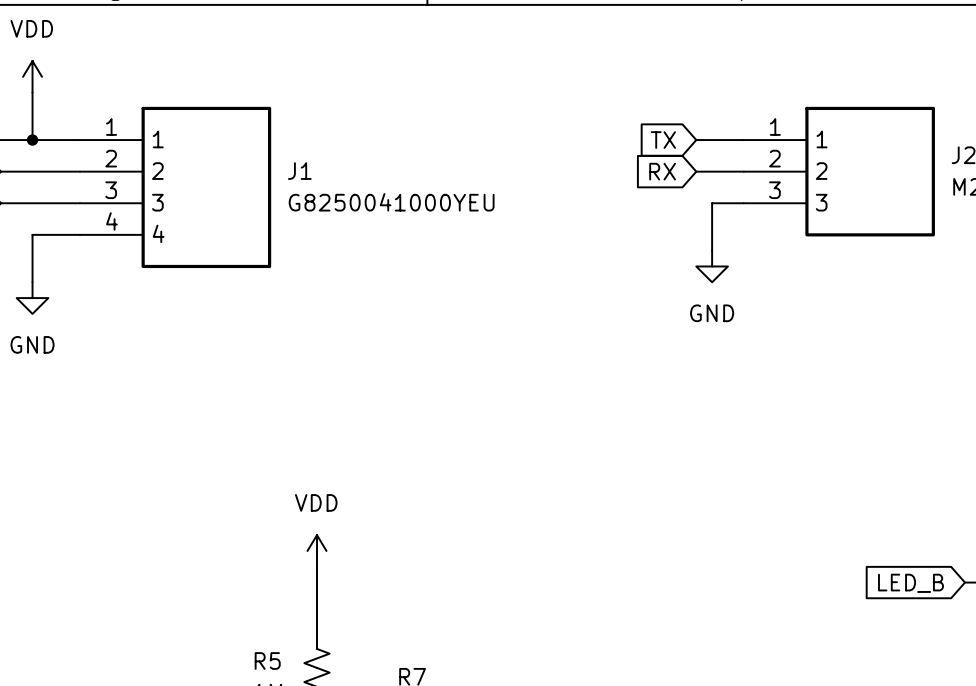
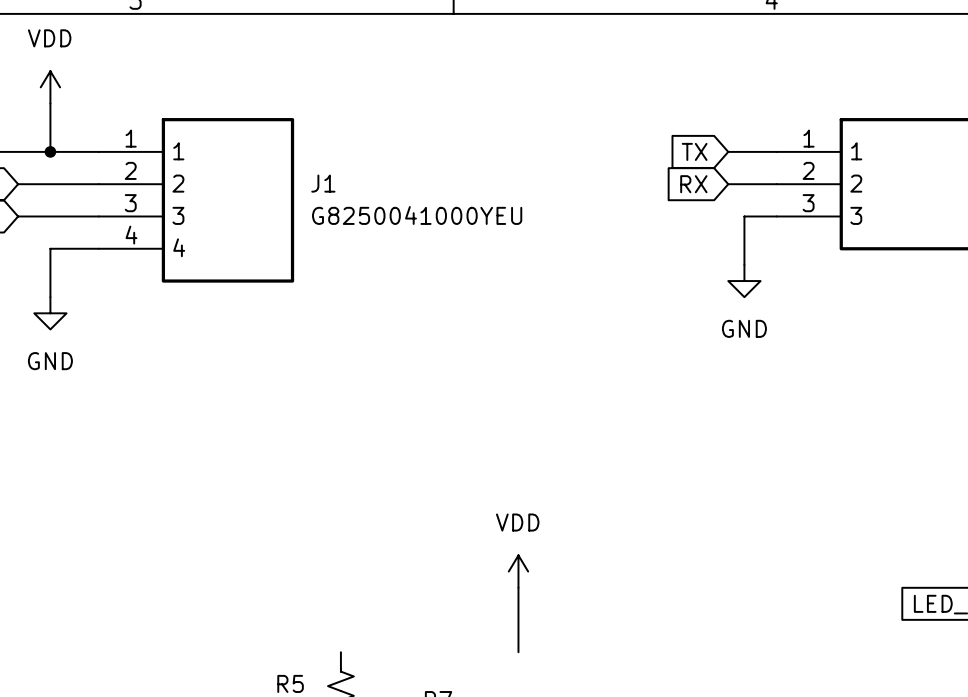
power symbol position: VDD (317, 550) -> VDD (518, 571)
wire: (317, 566) (317, 629) -> (518, 587) (518, 652)

